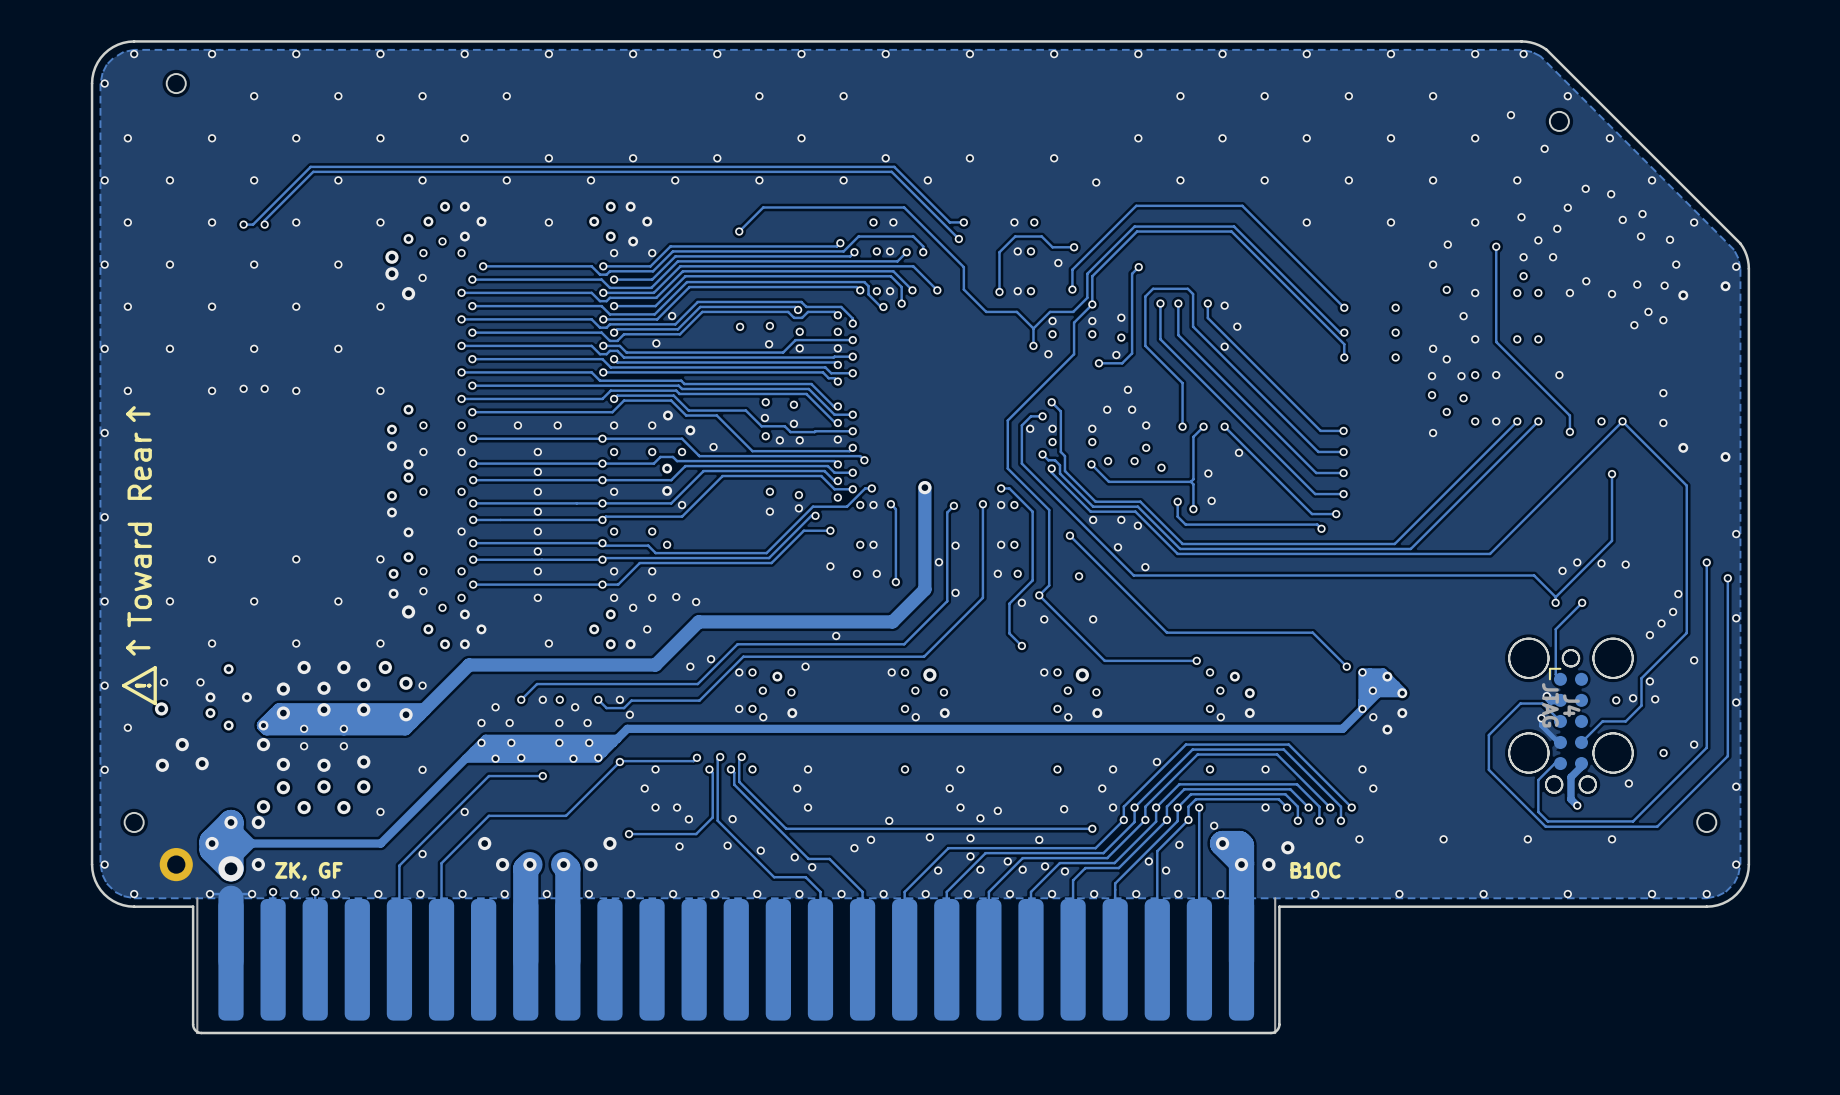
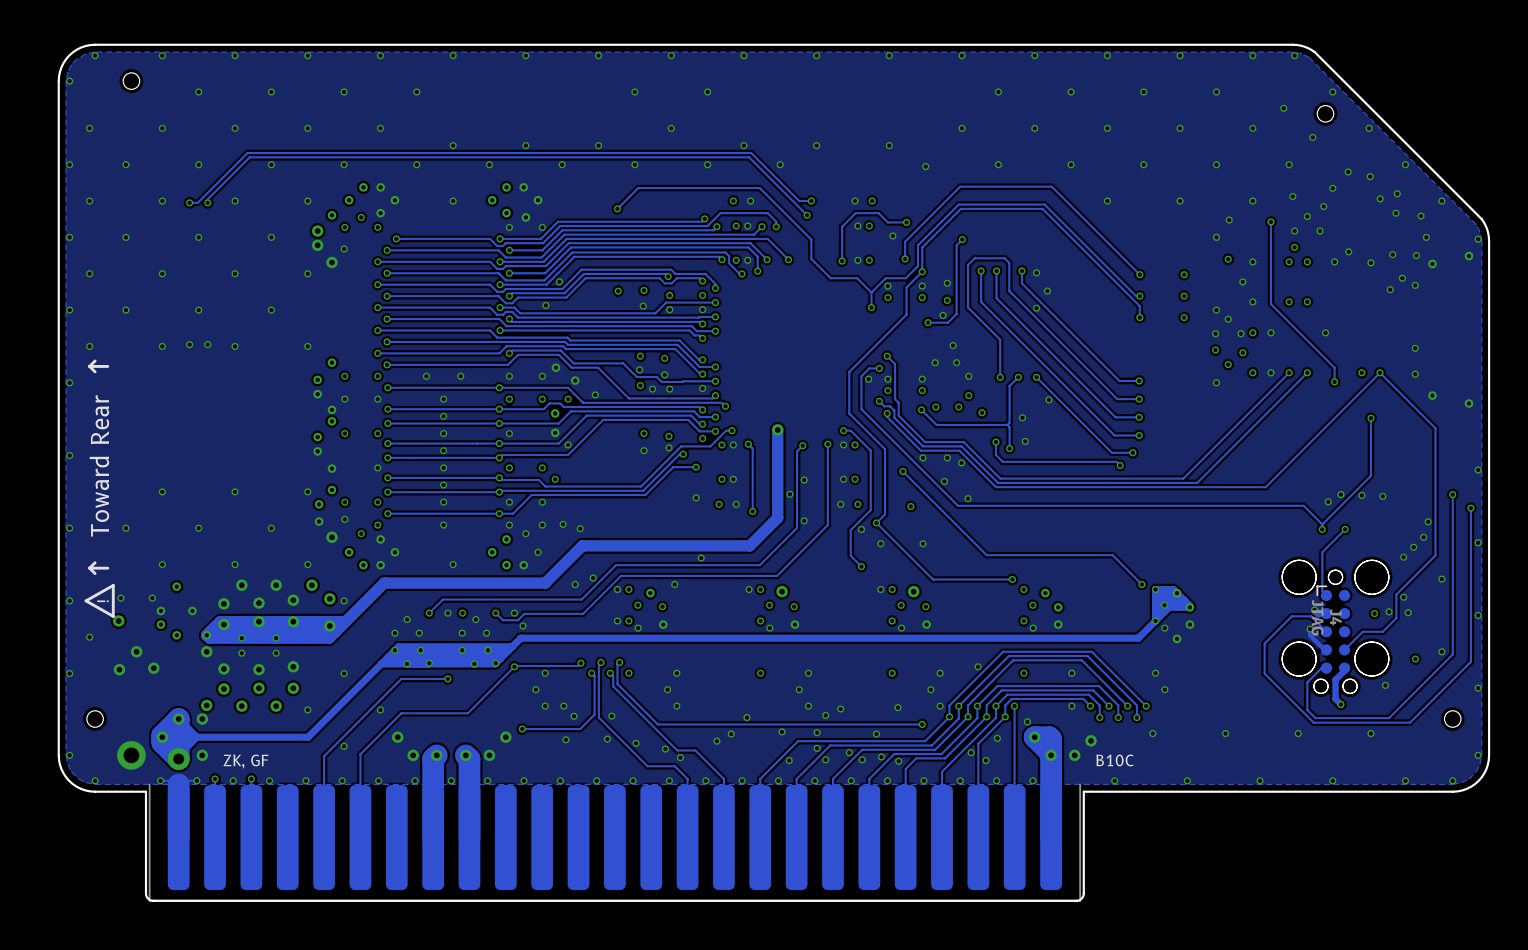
via: (1048, 354) -> none

